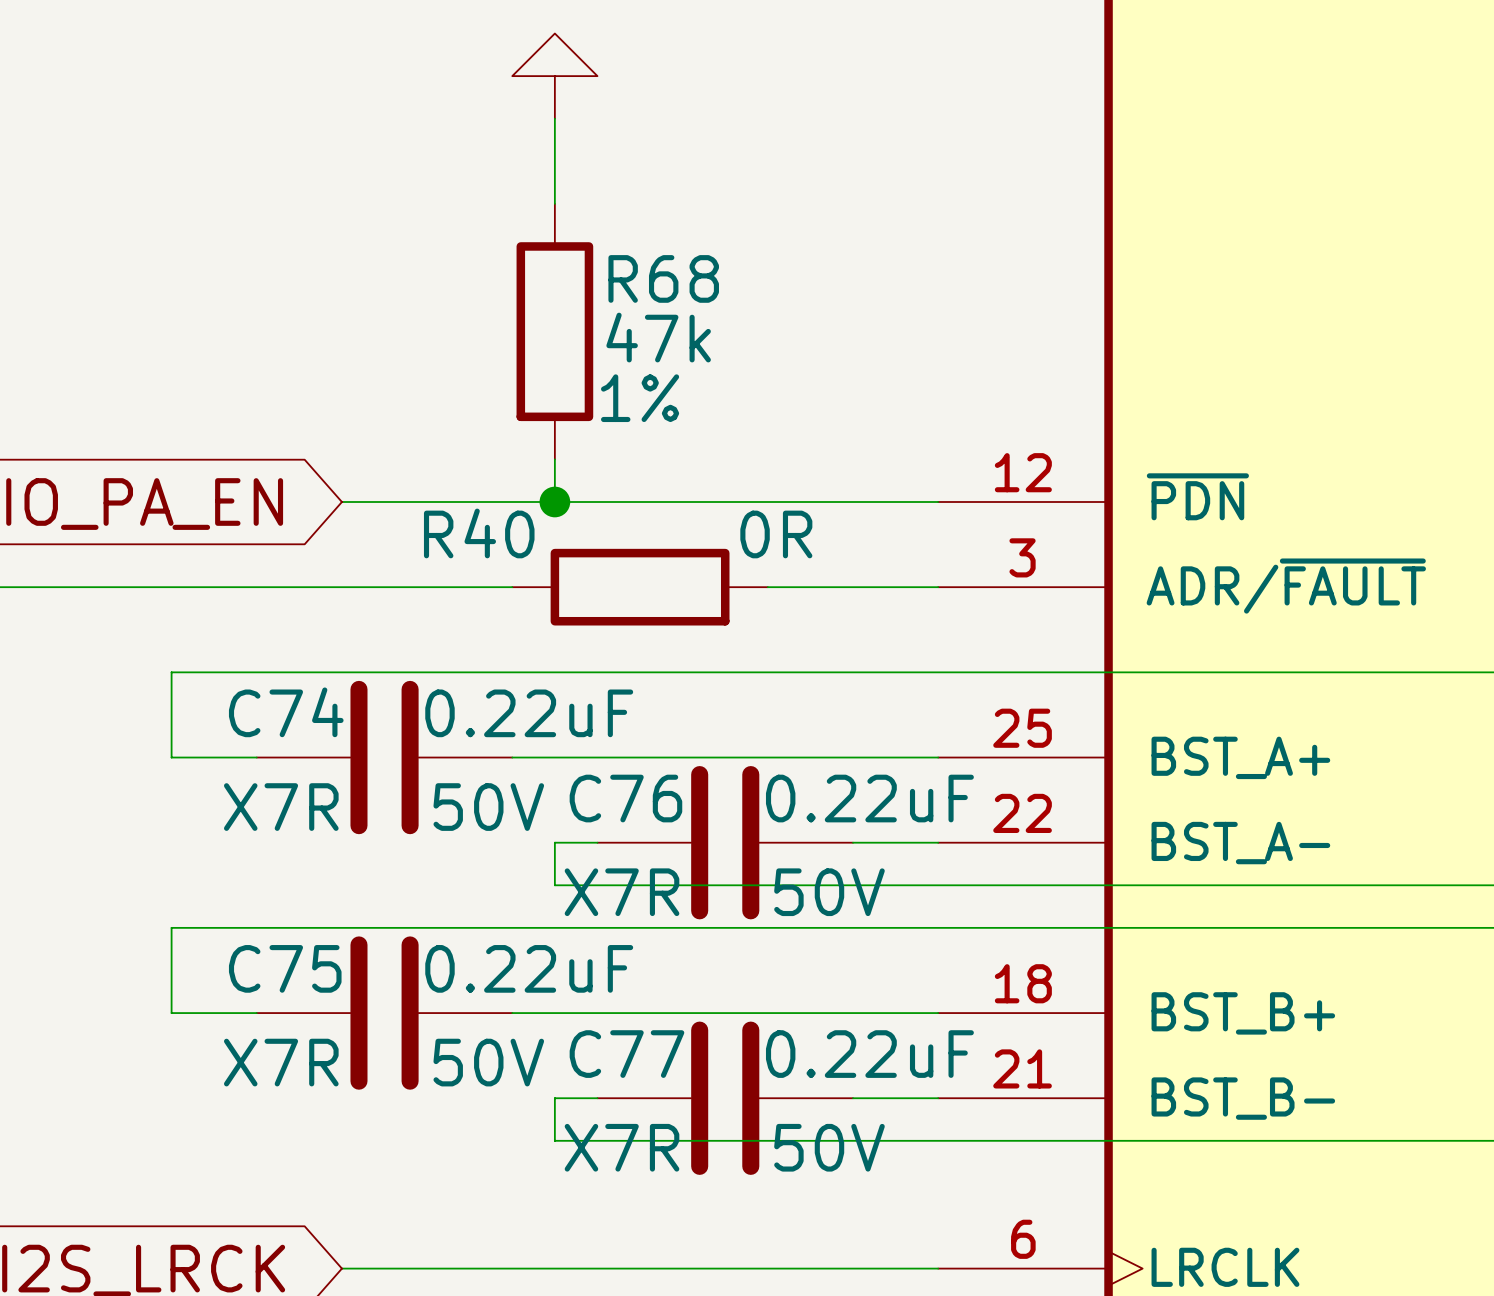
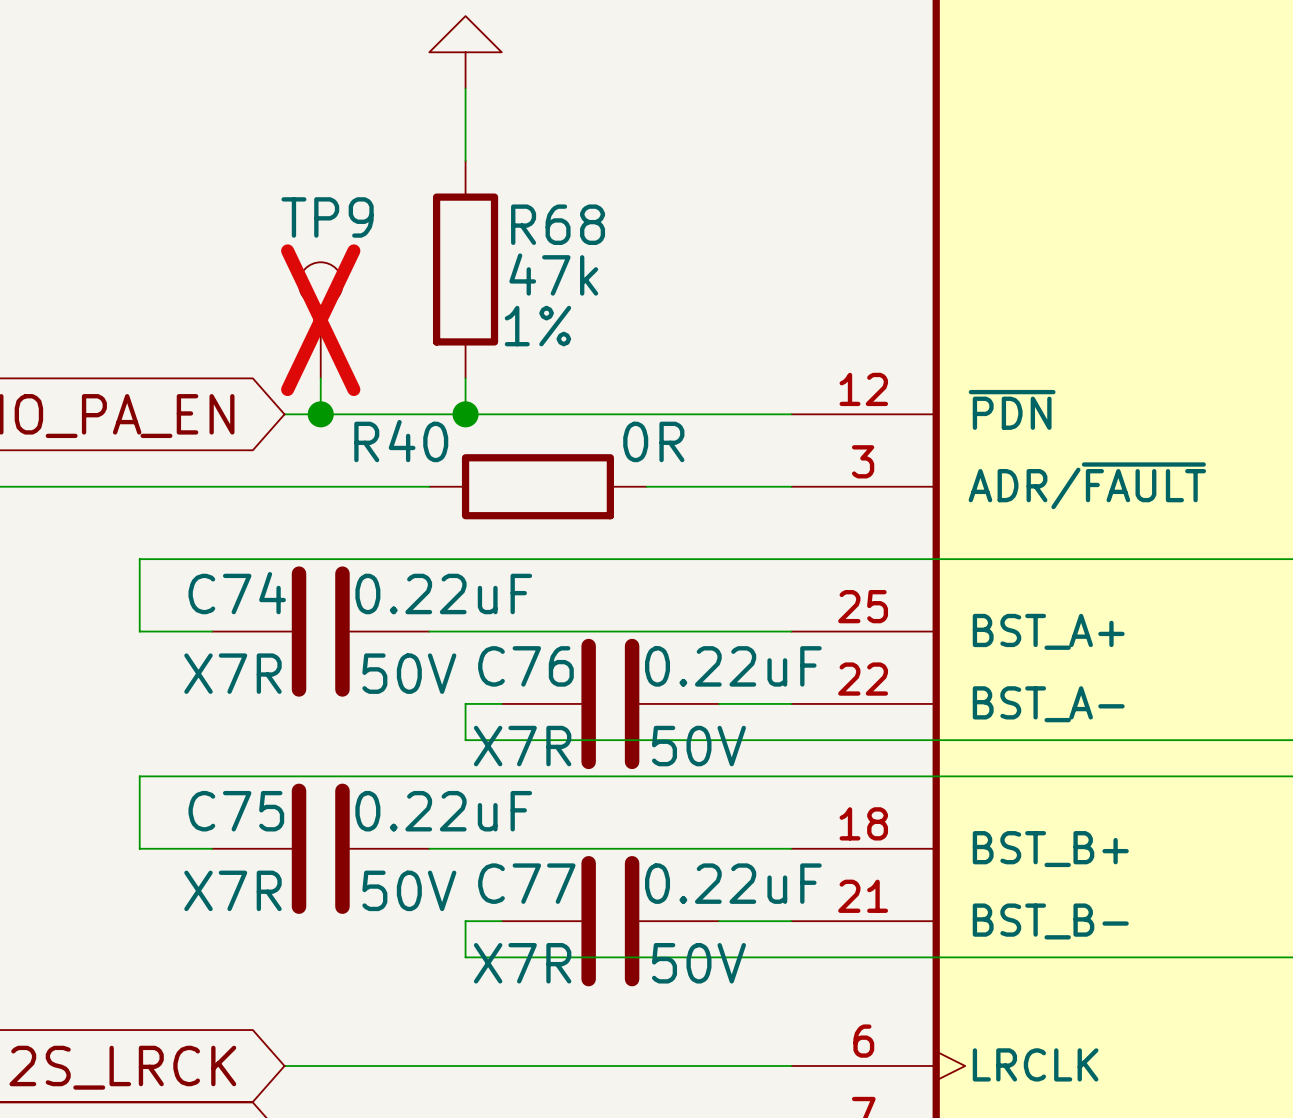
TP9: none -> (320, 320)
wire: none -> (320, 378) (320, 414)
junction: none -> (320, 414)

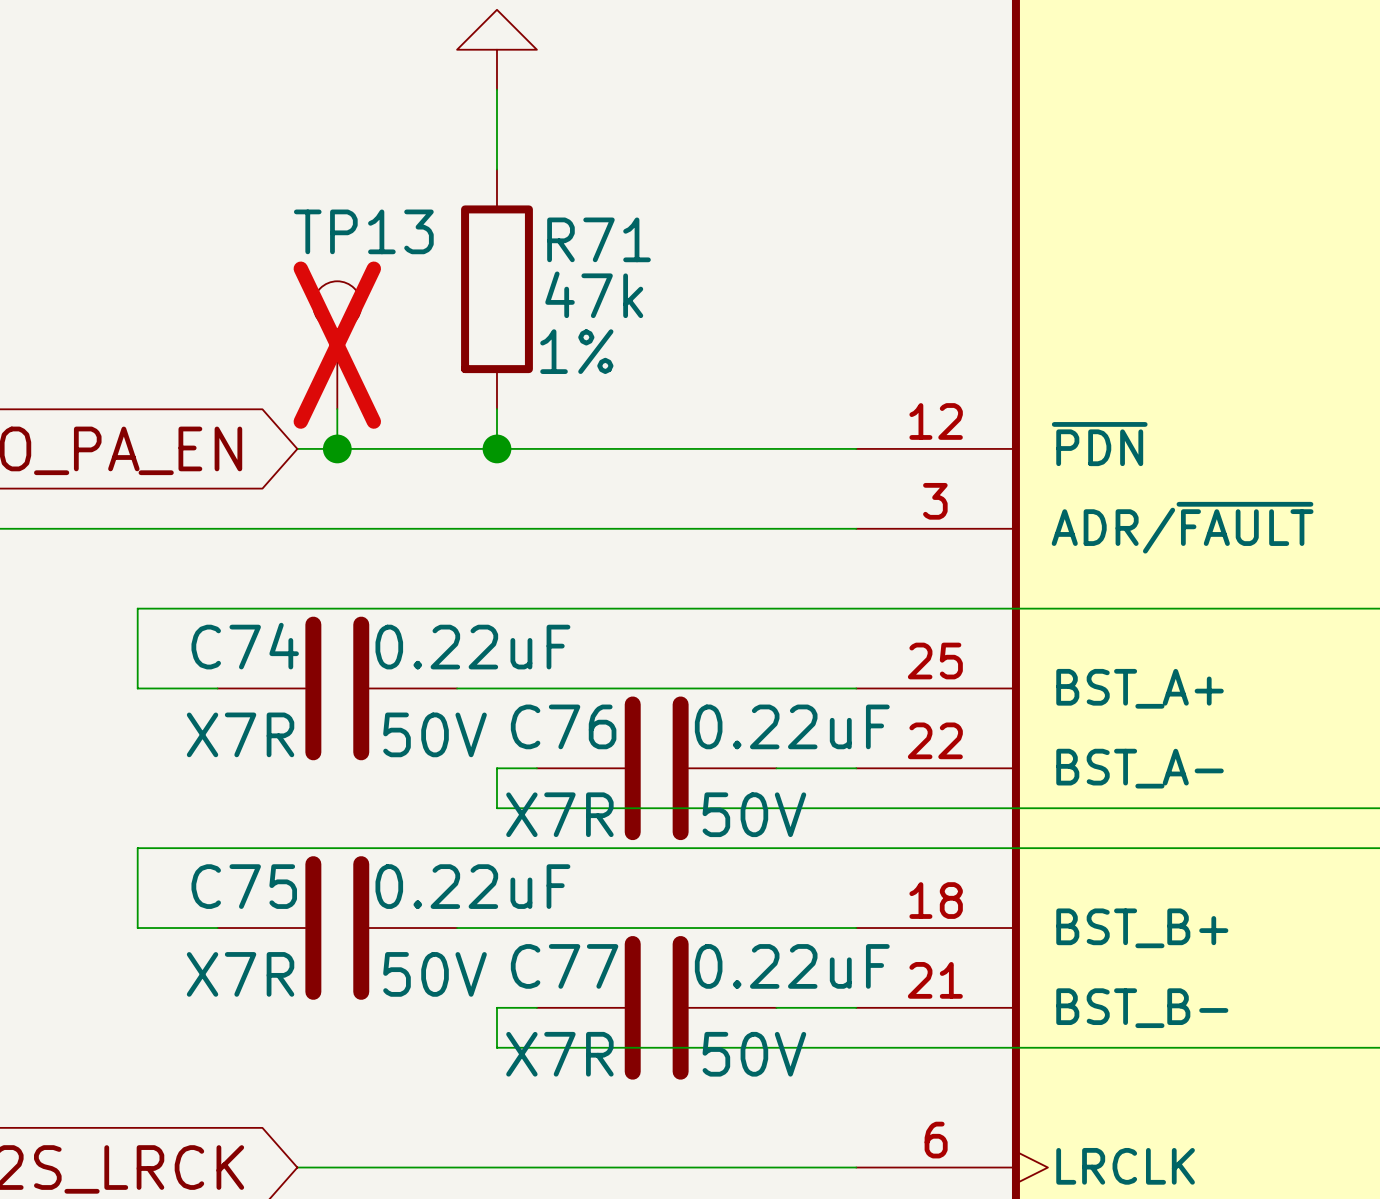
TP9 name: TP9 (327, 217) -> TP13 (363, 231)
R68 name: R68 (558, 224) -> R71 (598, 239)
wire: none -> (457, 528) (696, 528)
R40: 0R (537, 486) -> none

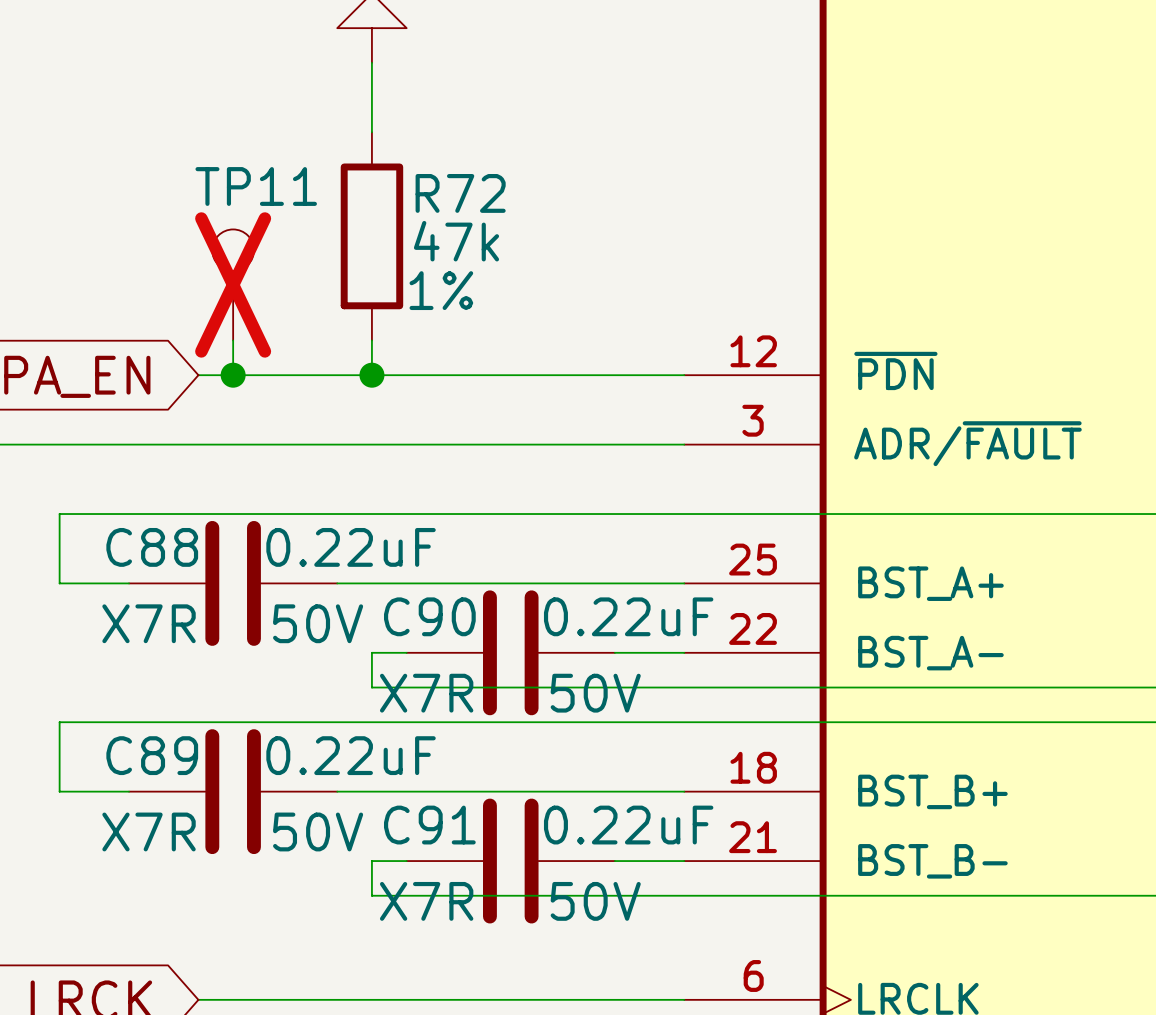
TP13 name: TP13 (363, 231) -> TP11 (256, 186)
R71 name: R71 (598, 239) -> R72 (460, 193)
C74 name: C74 (245, 646) -> C88 (152, 547)
C76 name: C76 (563, 726) -> C90 (429, 616)
C75 name: C75 (244, 886) -> C89 (152, 755)
C77 name: C77 (564, 966) -> C91 (429, 825)

